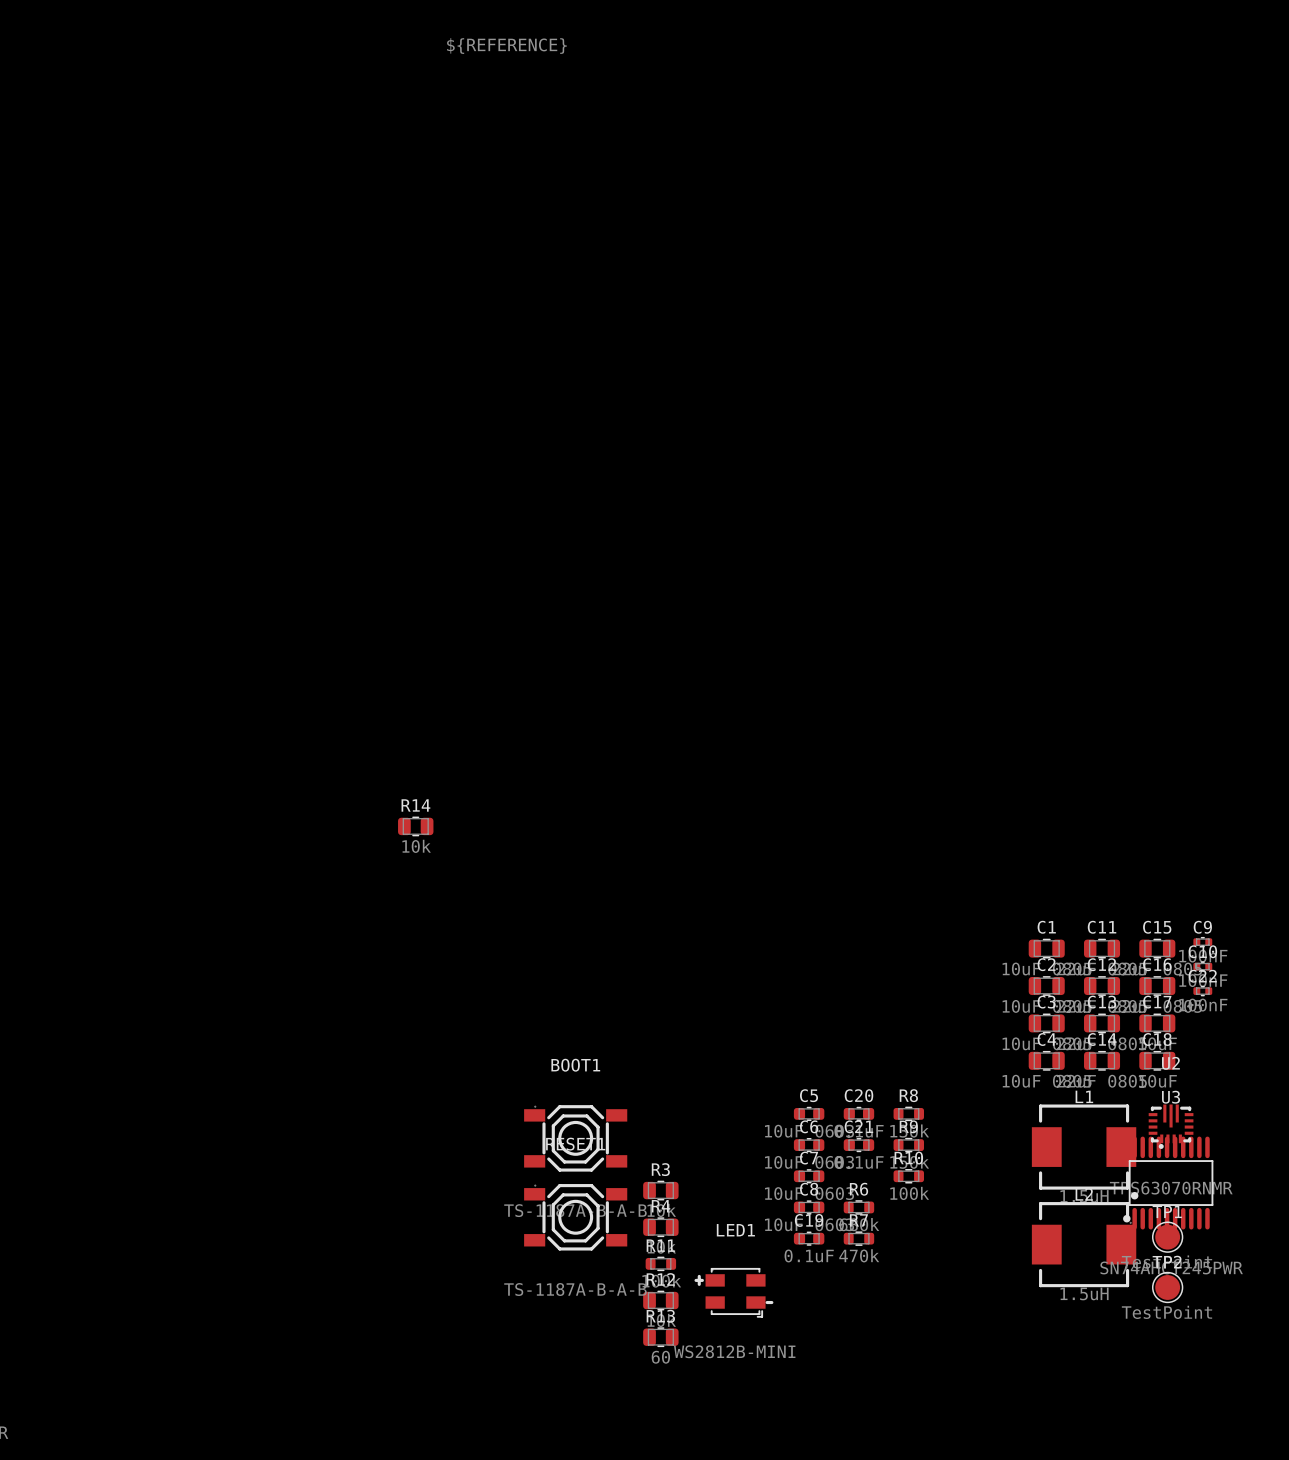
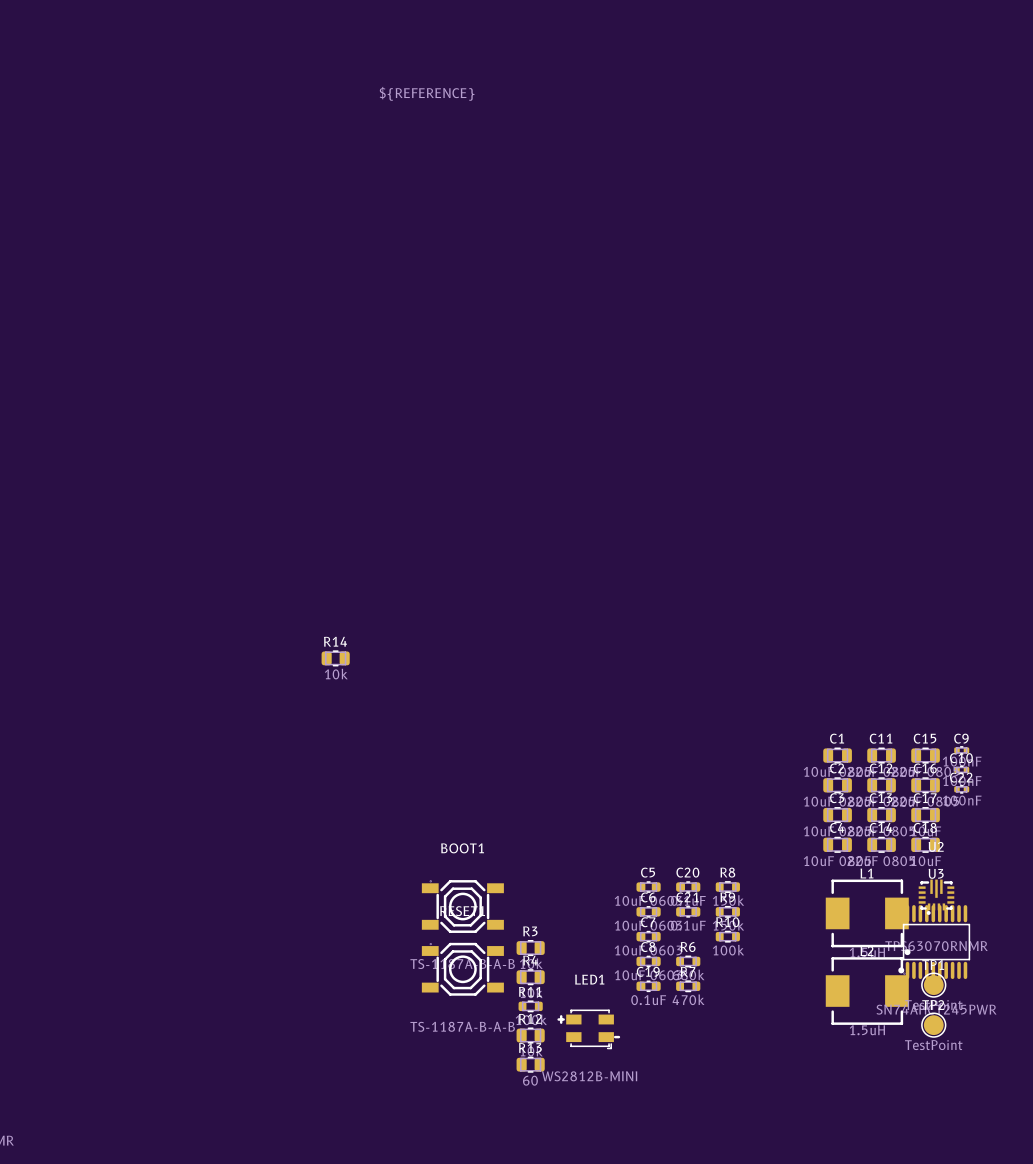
text position: ${REFERENCE} (506, 46) -> ${REFERENCE} (427, 93)

